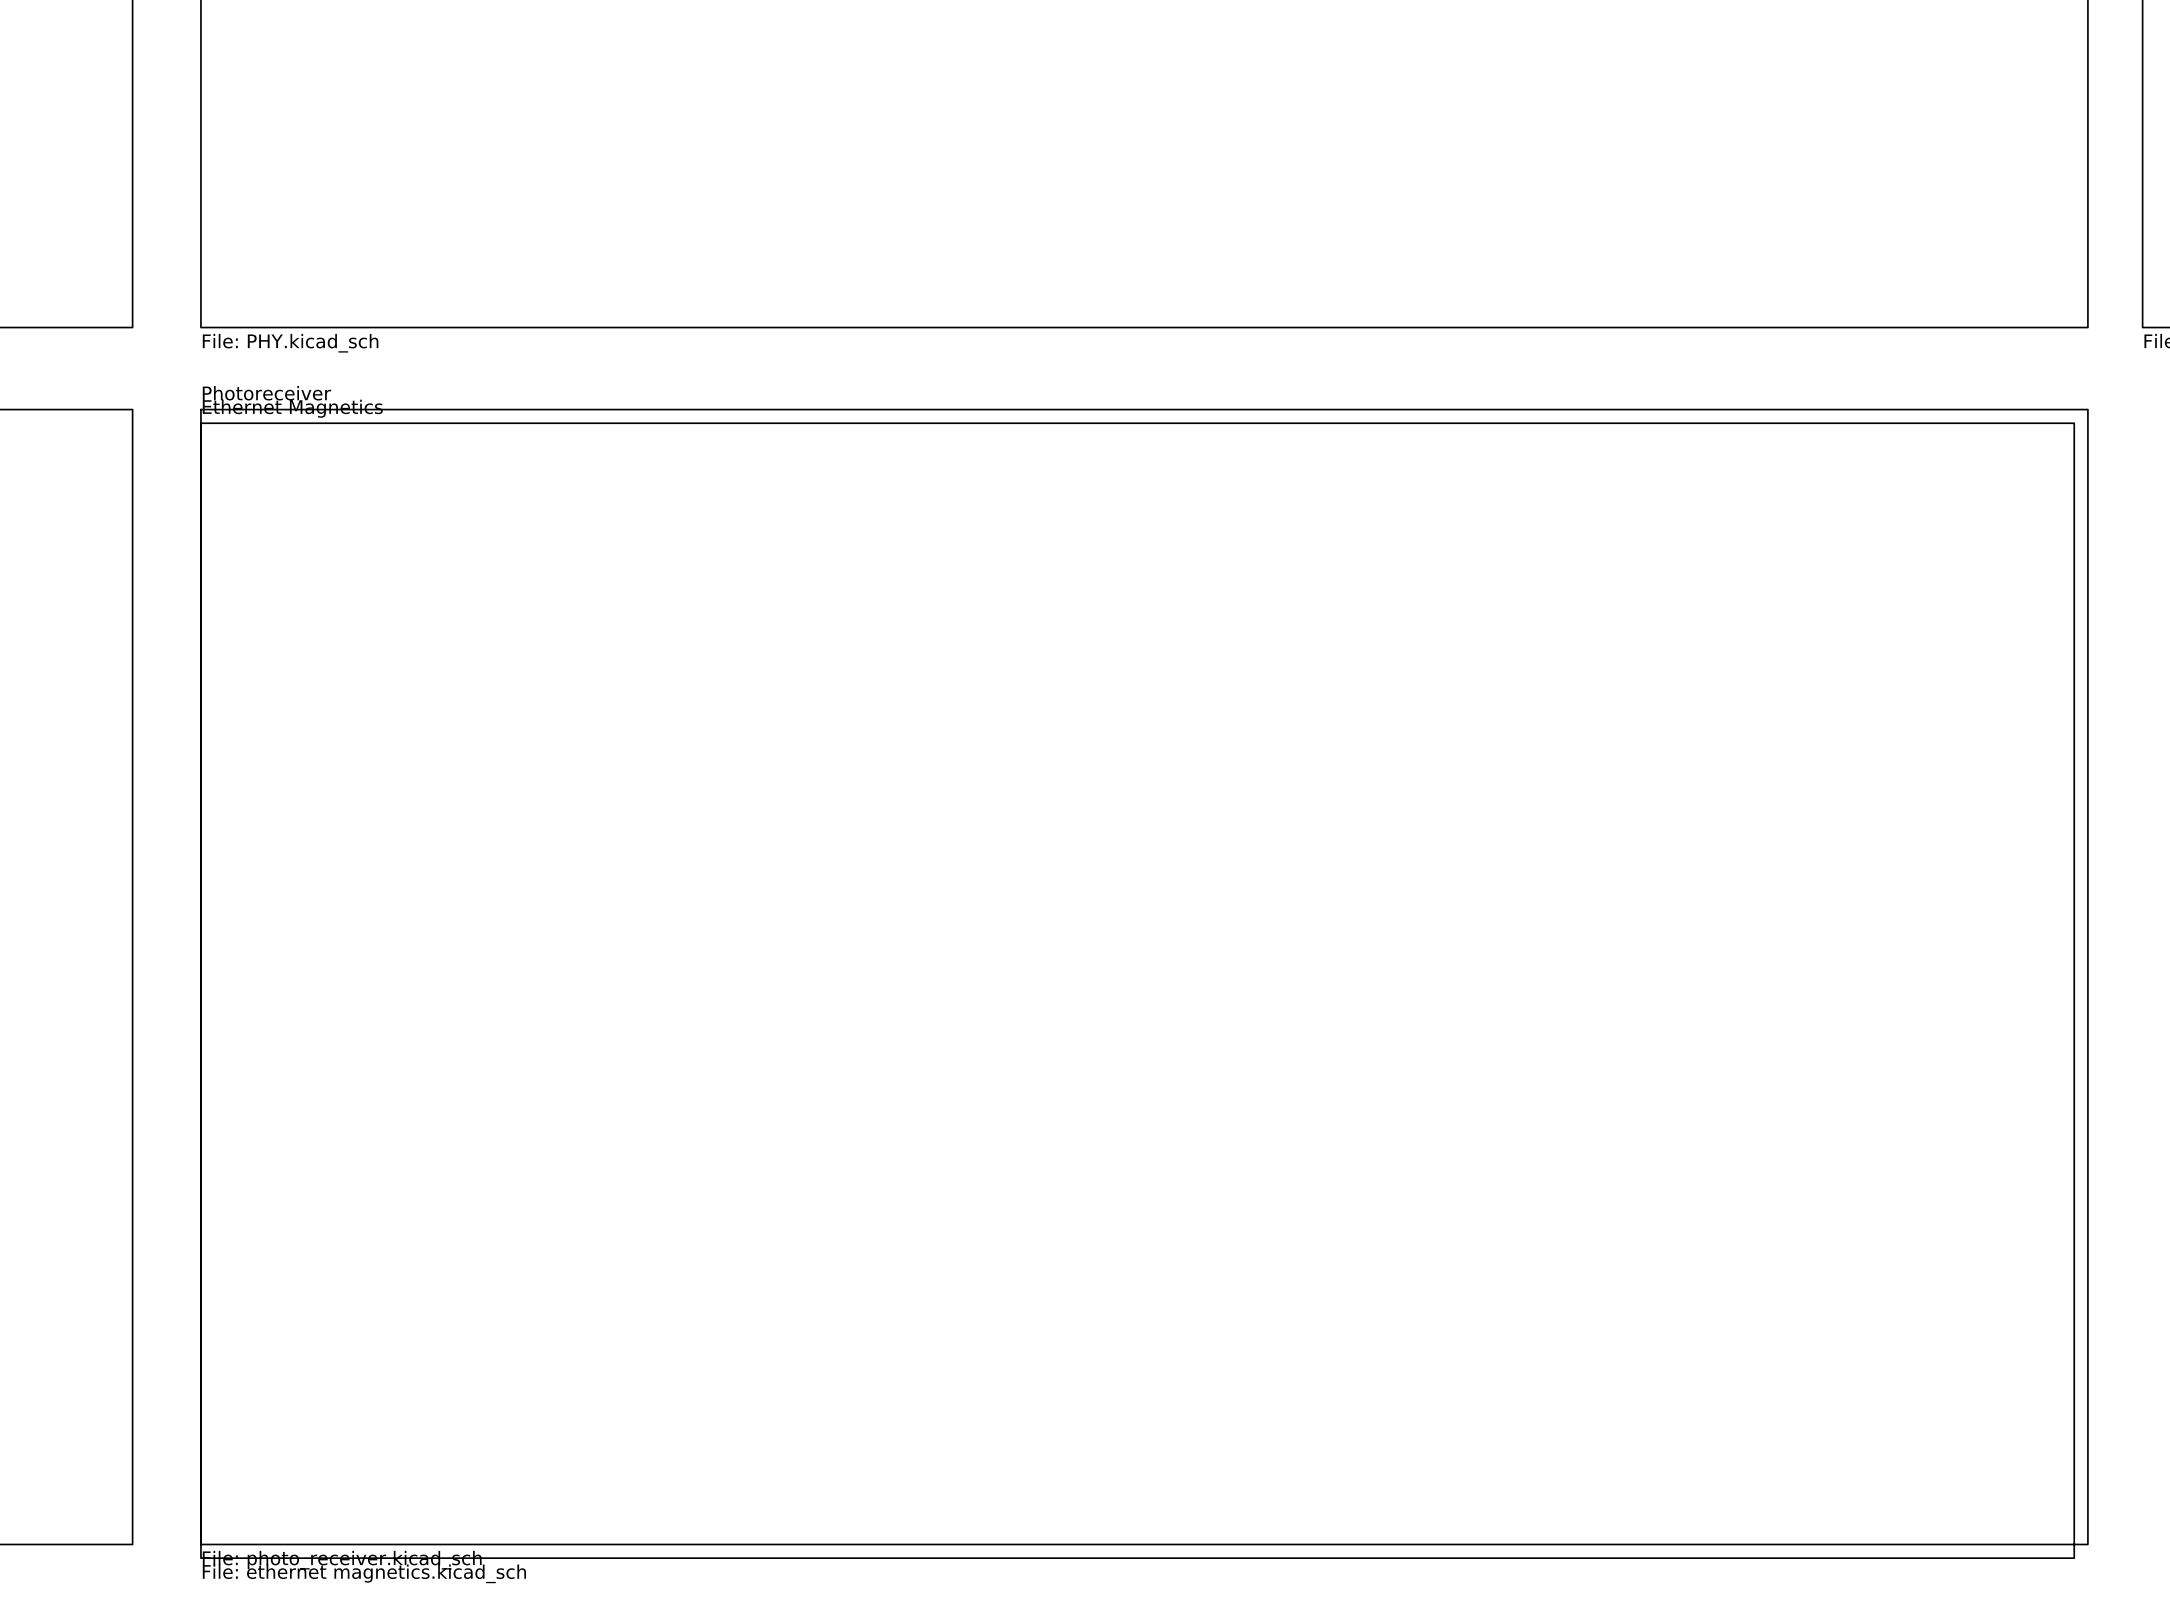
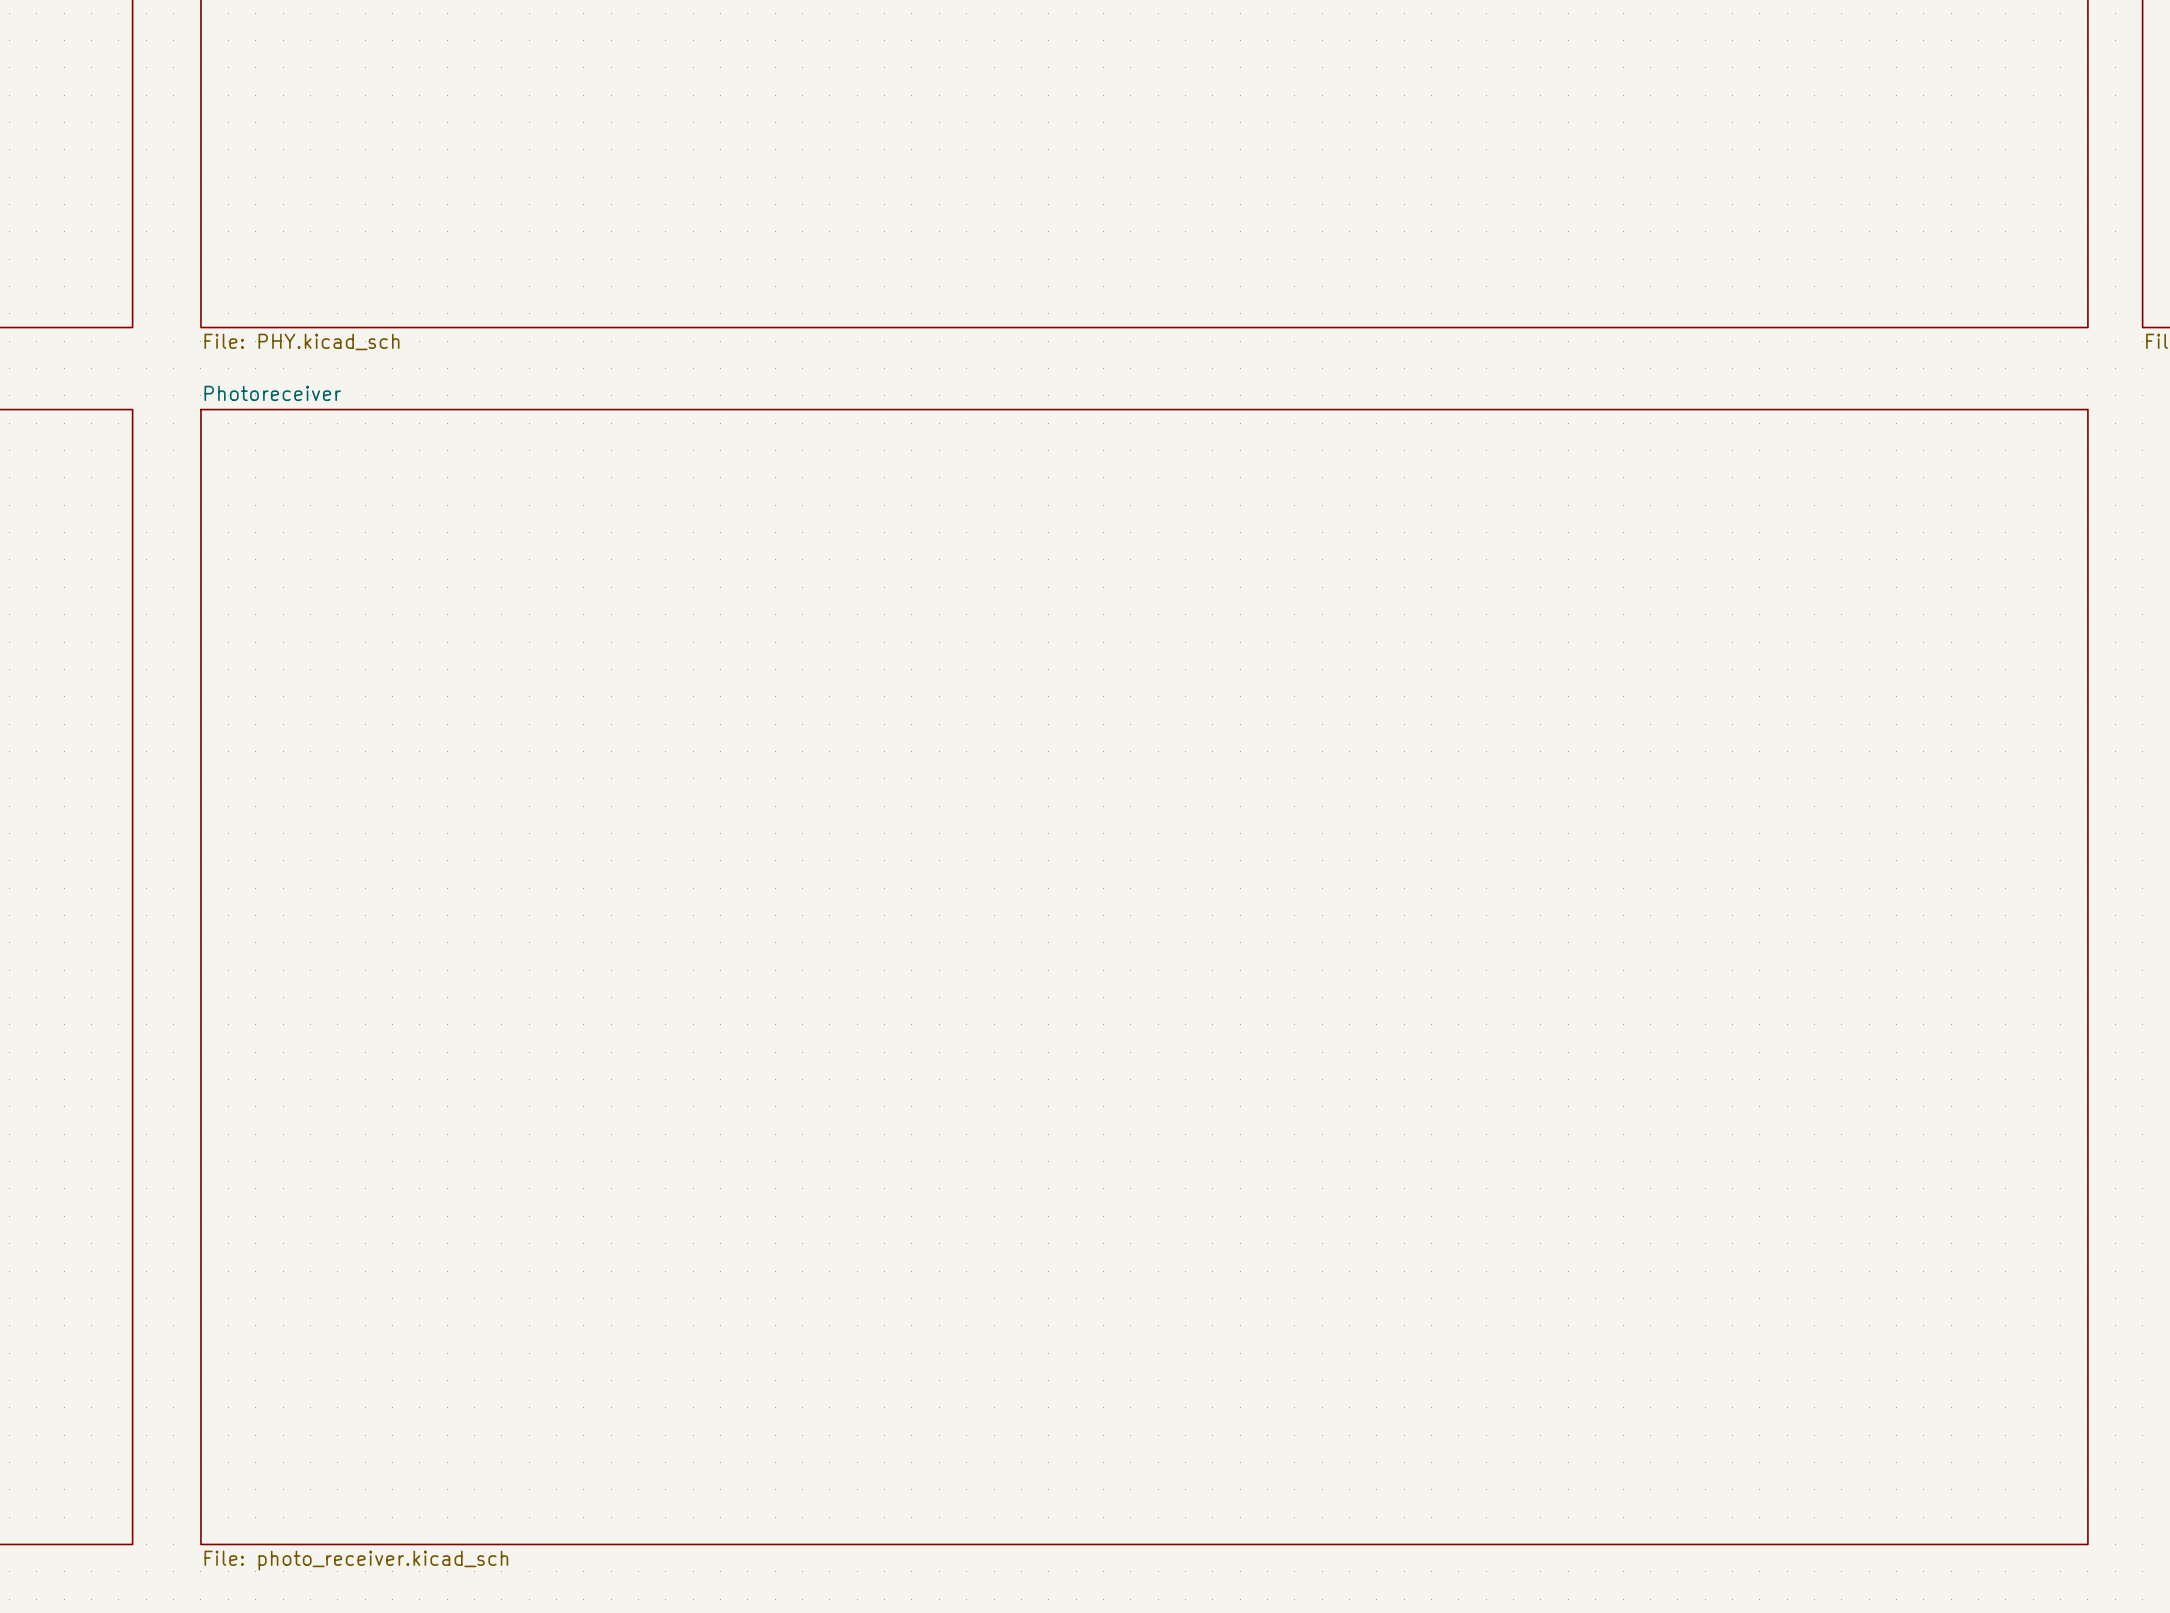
sheet Ethernet Magnetics: File: ethernet magnetics.kicad_sch (1137, 990) -> none

